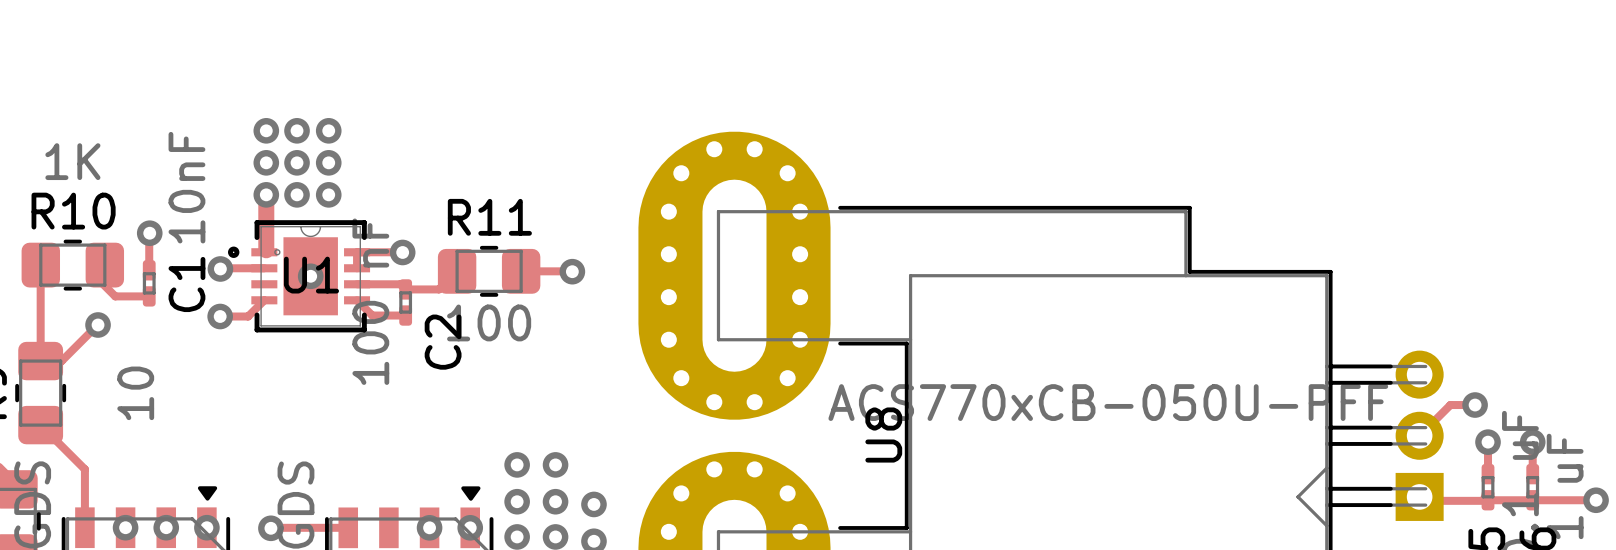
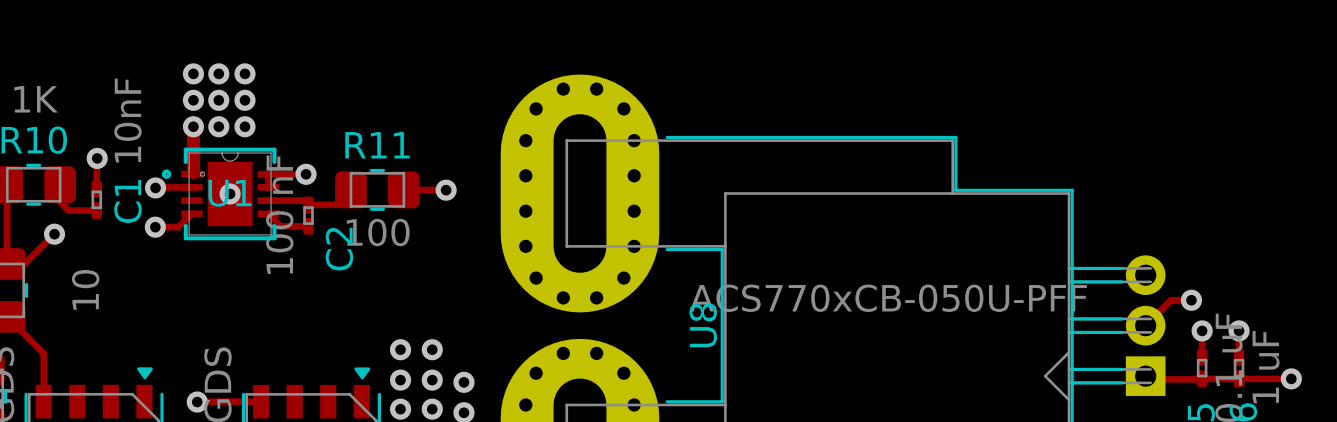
via: (125, 527) -> none
via: (166, 527) -> none
via: (206, 527) -> none
via: (429, 527) -> none
via: (470, 527) -> none

